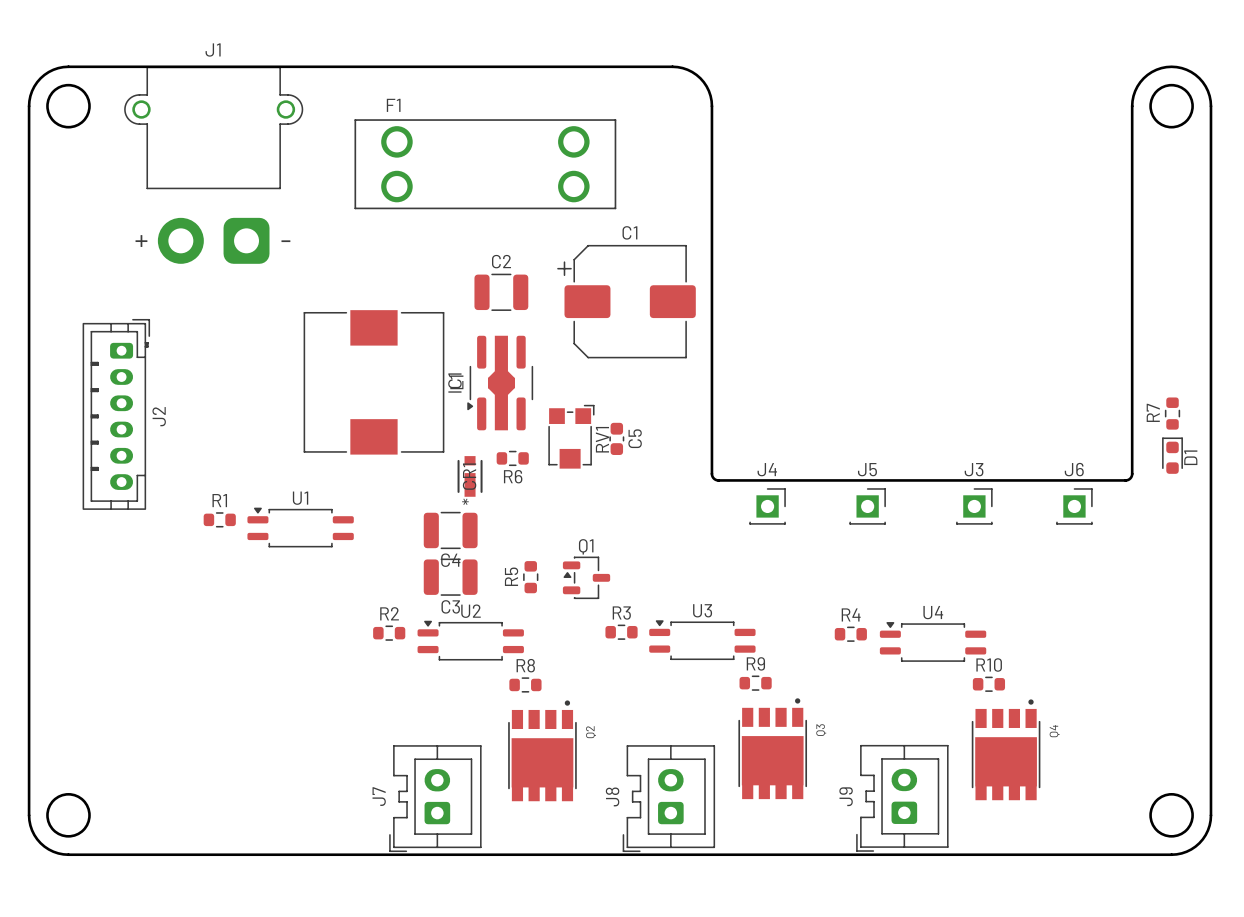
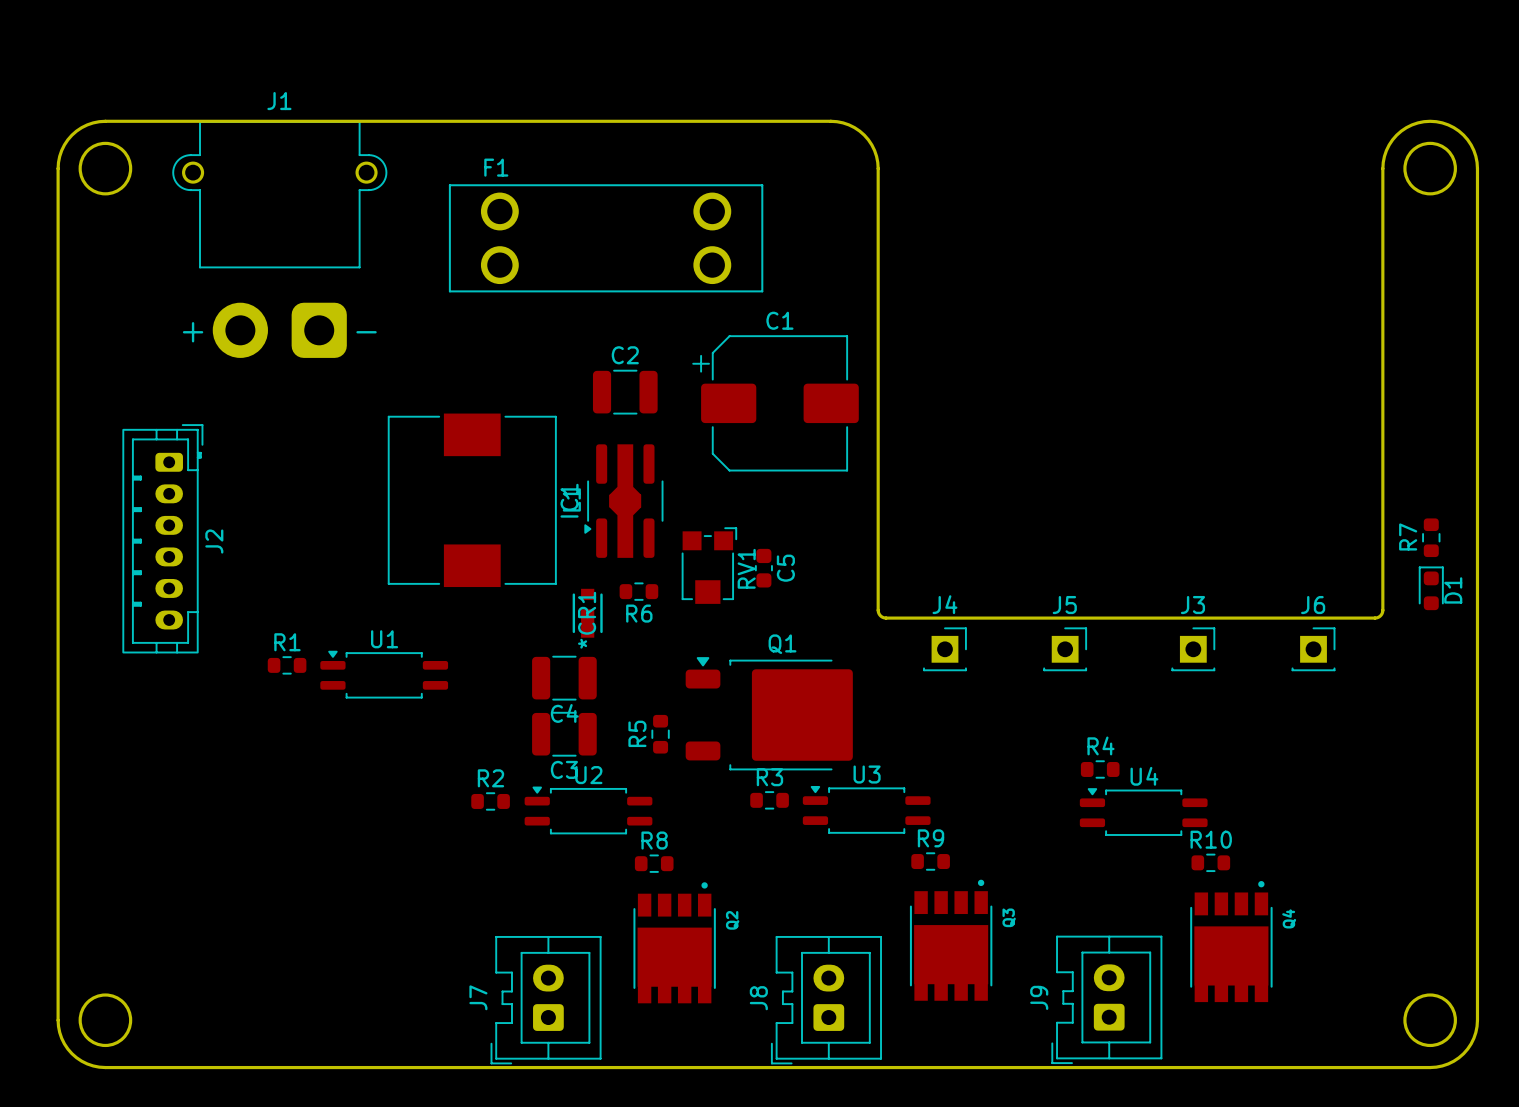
Q1 name position: Q1 (586, 546) -> Q1 (782, 644)
Q1 footprint: [562, 556, 611, 600] -> [685, 657, 853, 771]
R4 position: (850, 634) -> (1100, 769)

